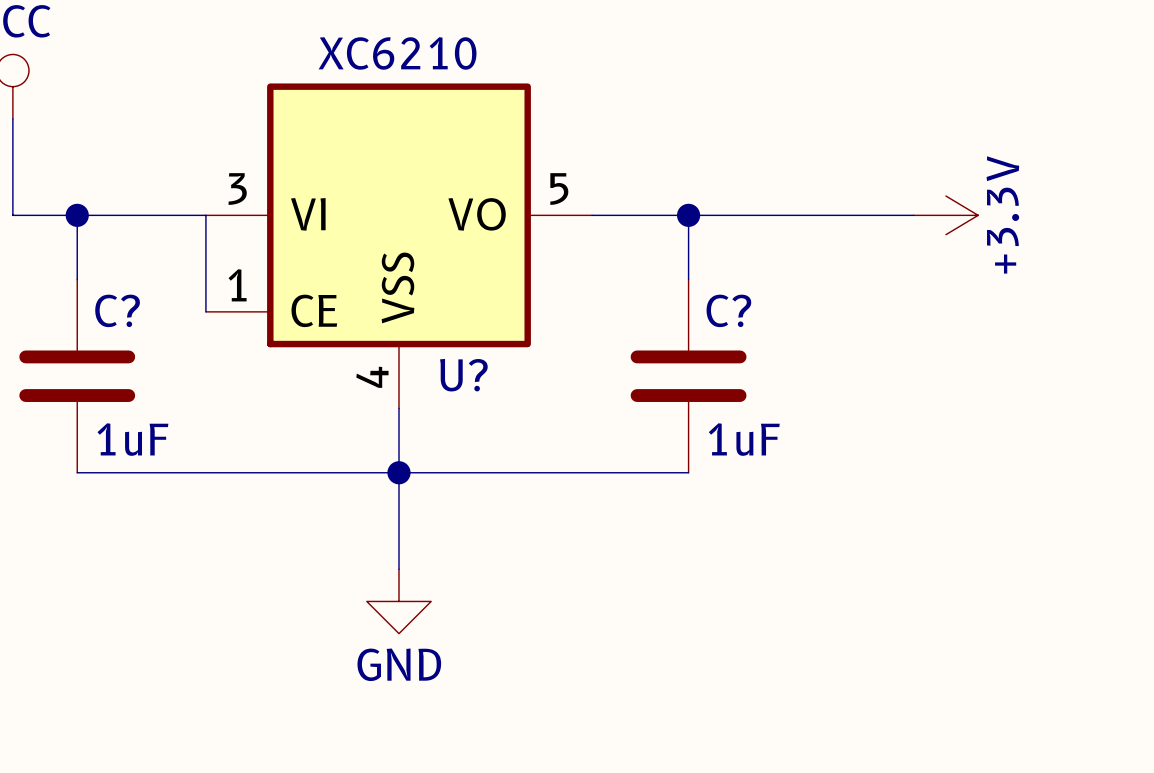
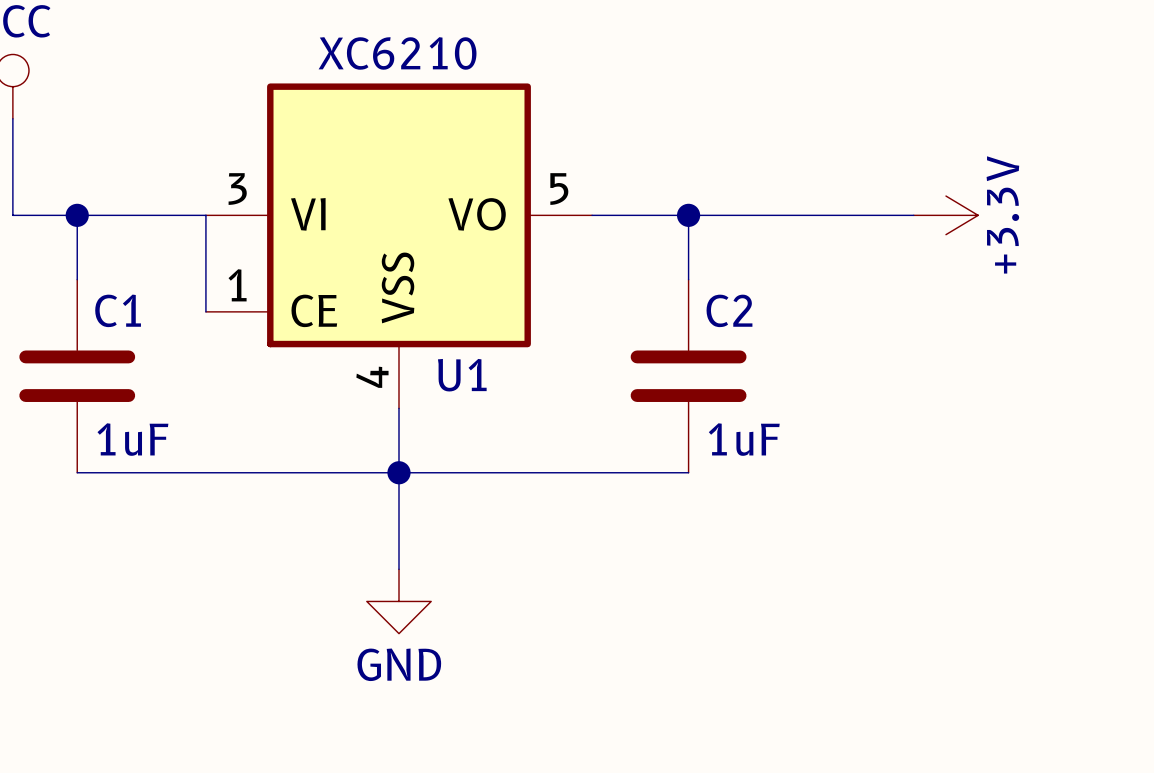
C? name: C? (117, 310) -> C1 (118, 310)
C? name: C? (728, 310) -> C2 (729, 310)
U? name: U? (463, 375) -> U1 (462, 375)

